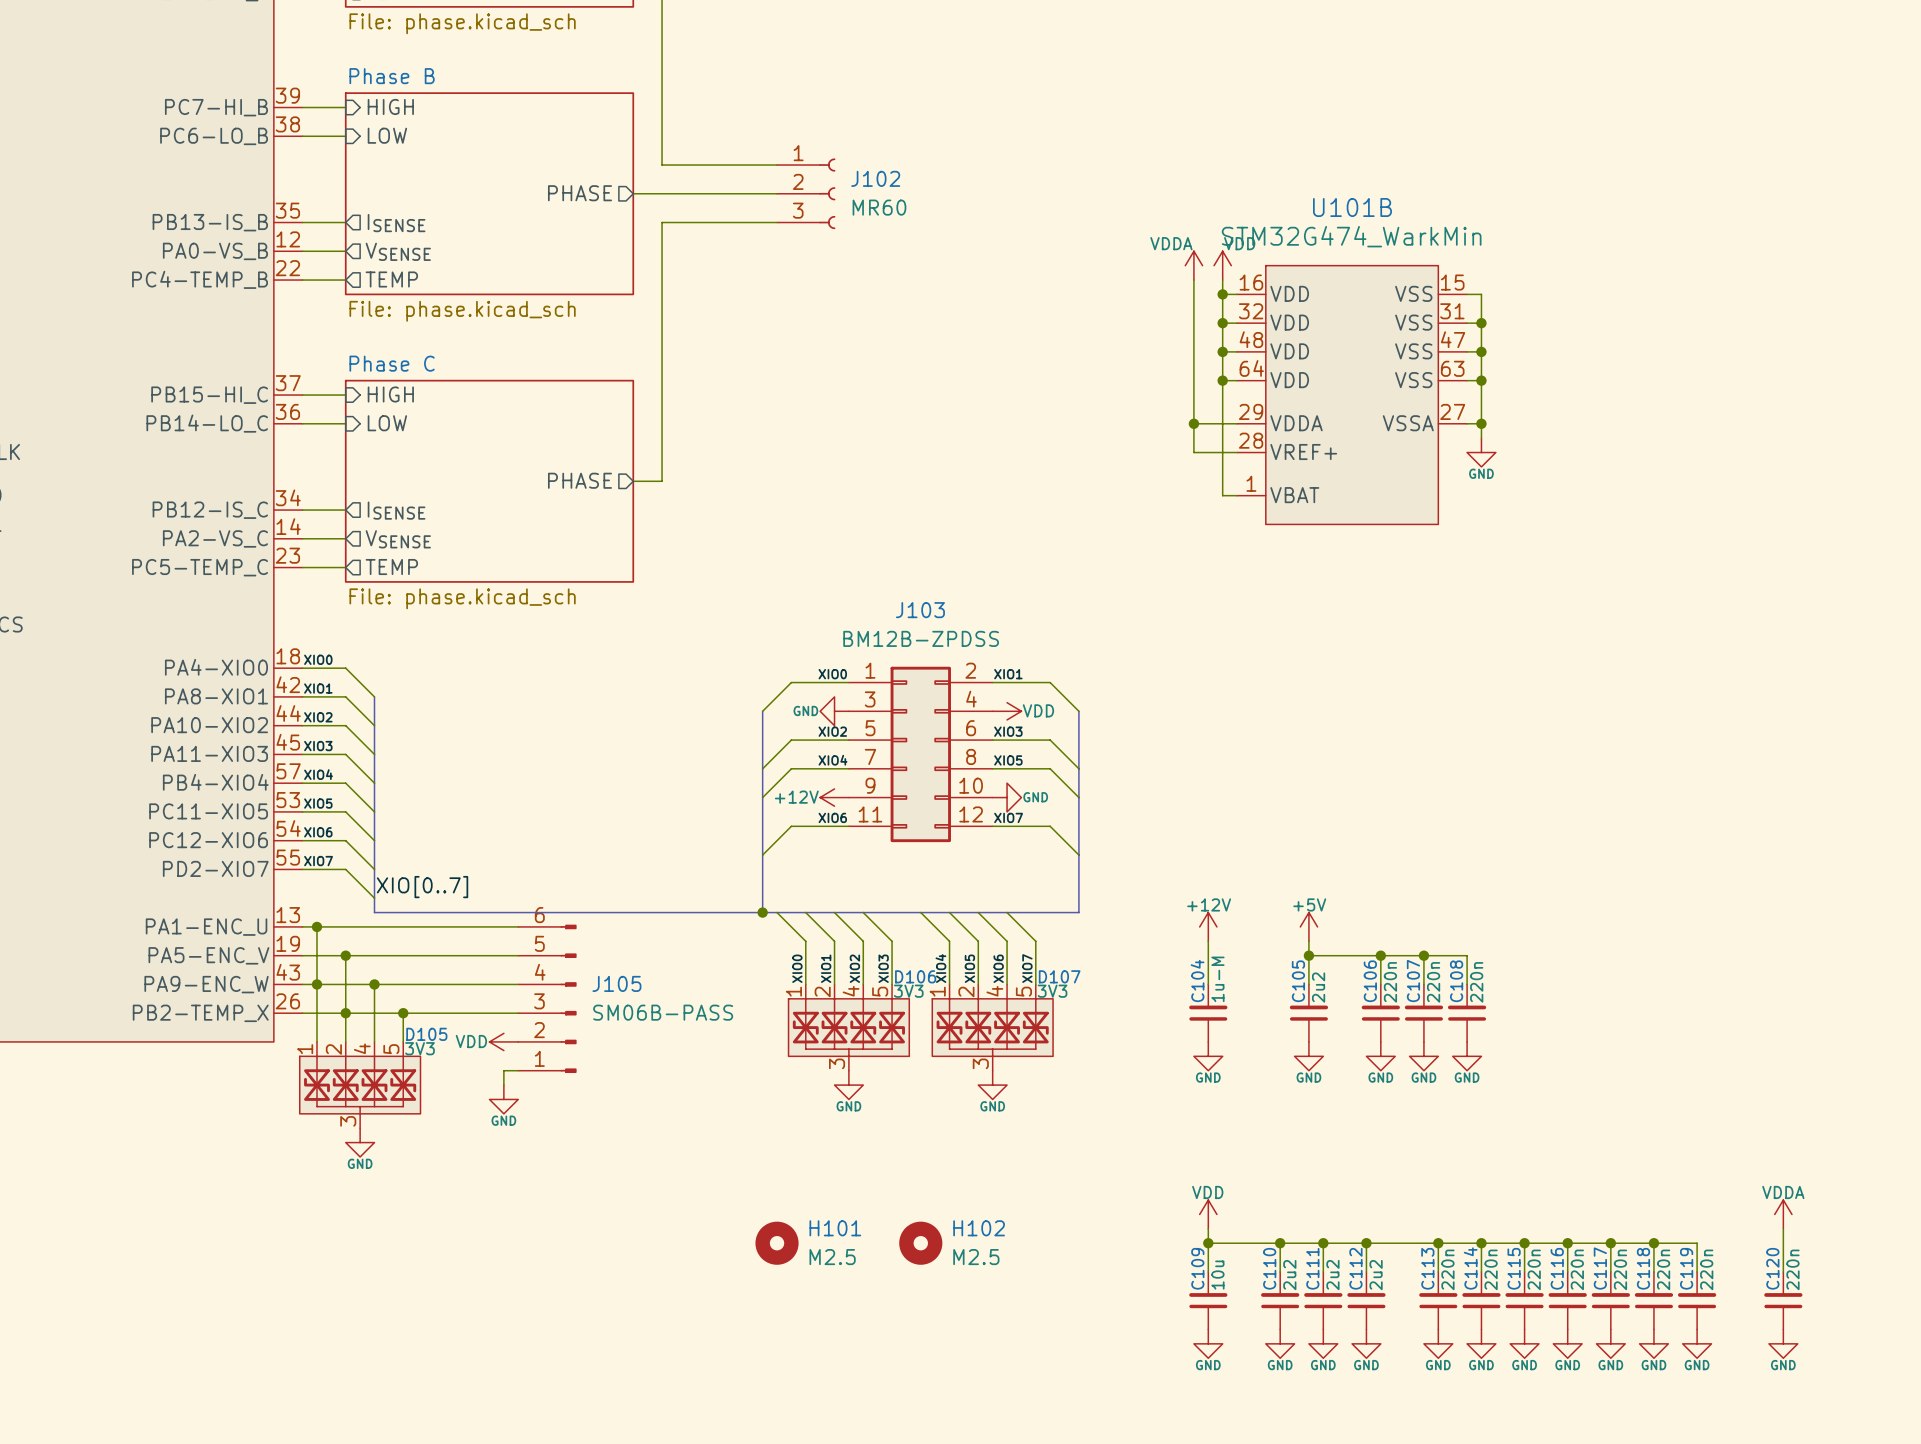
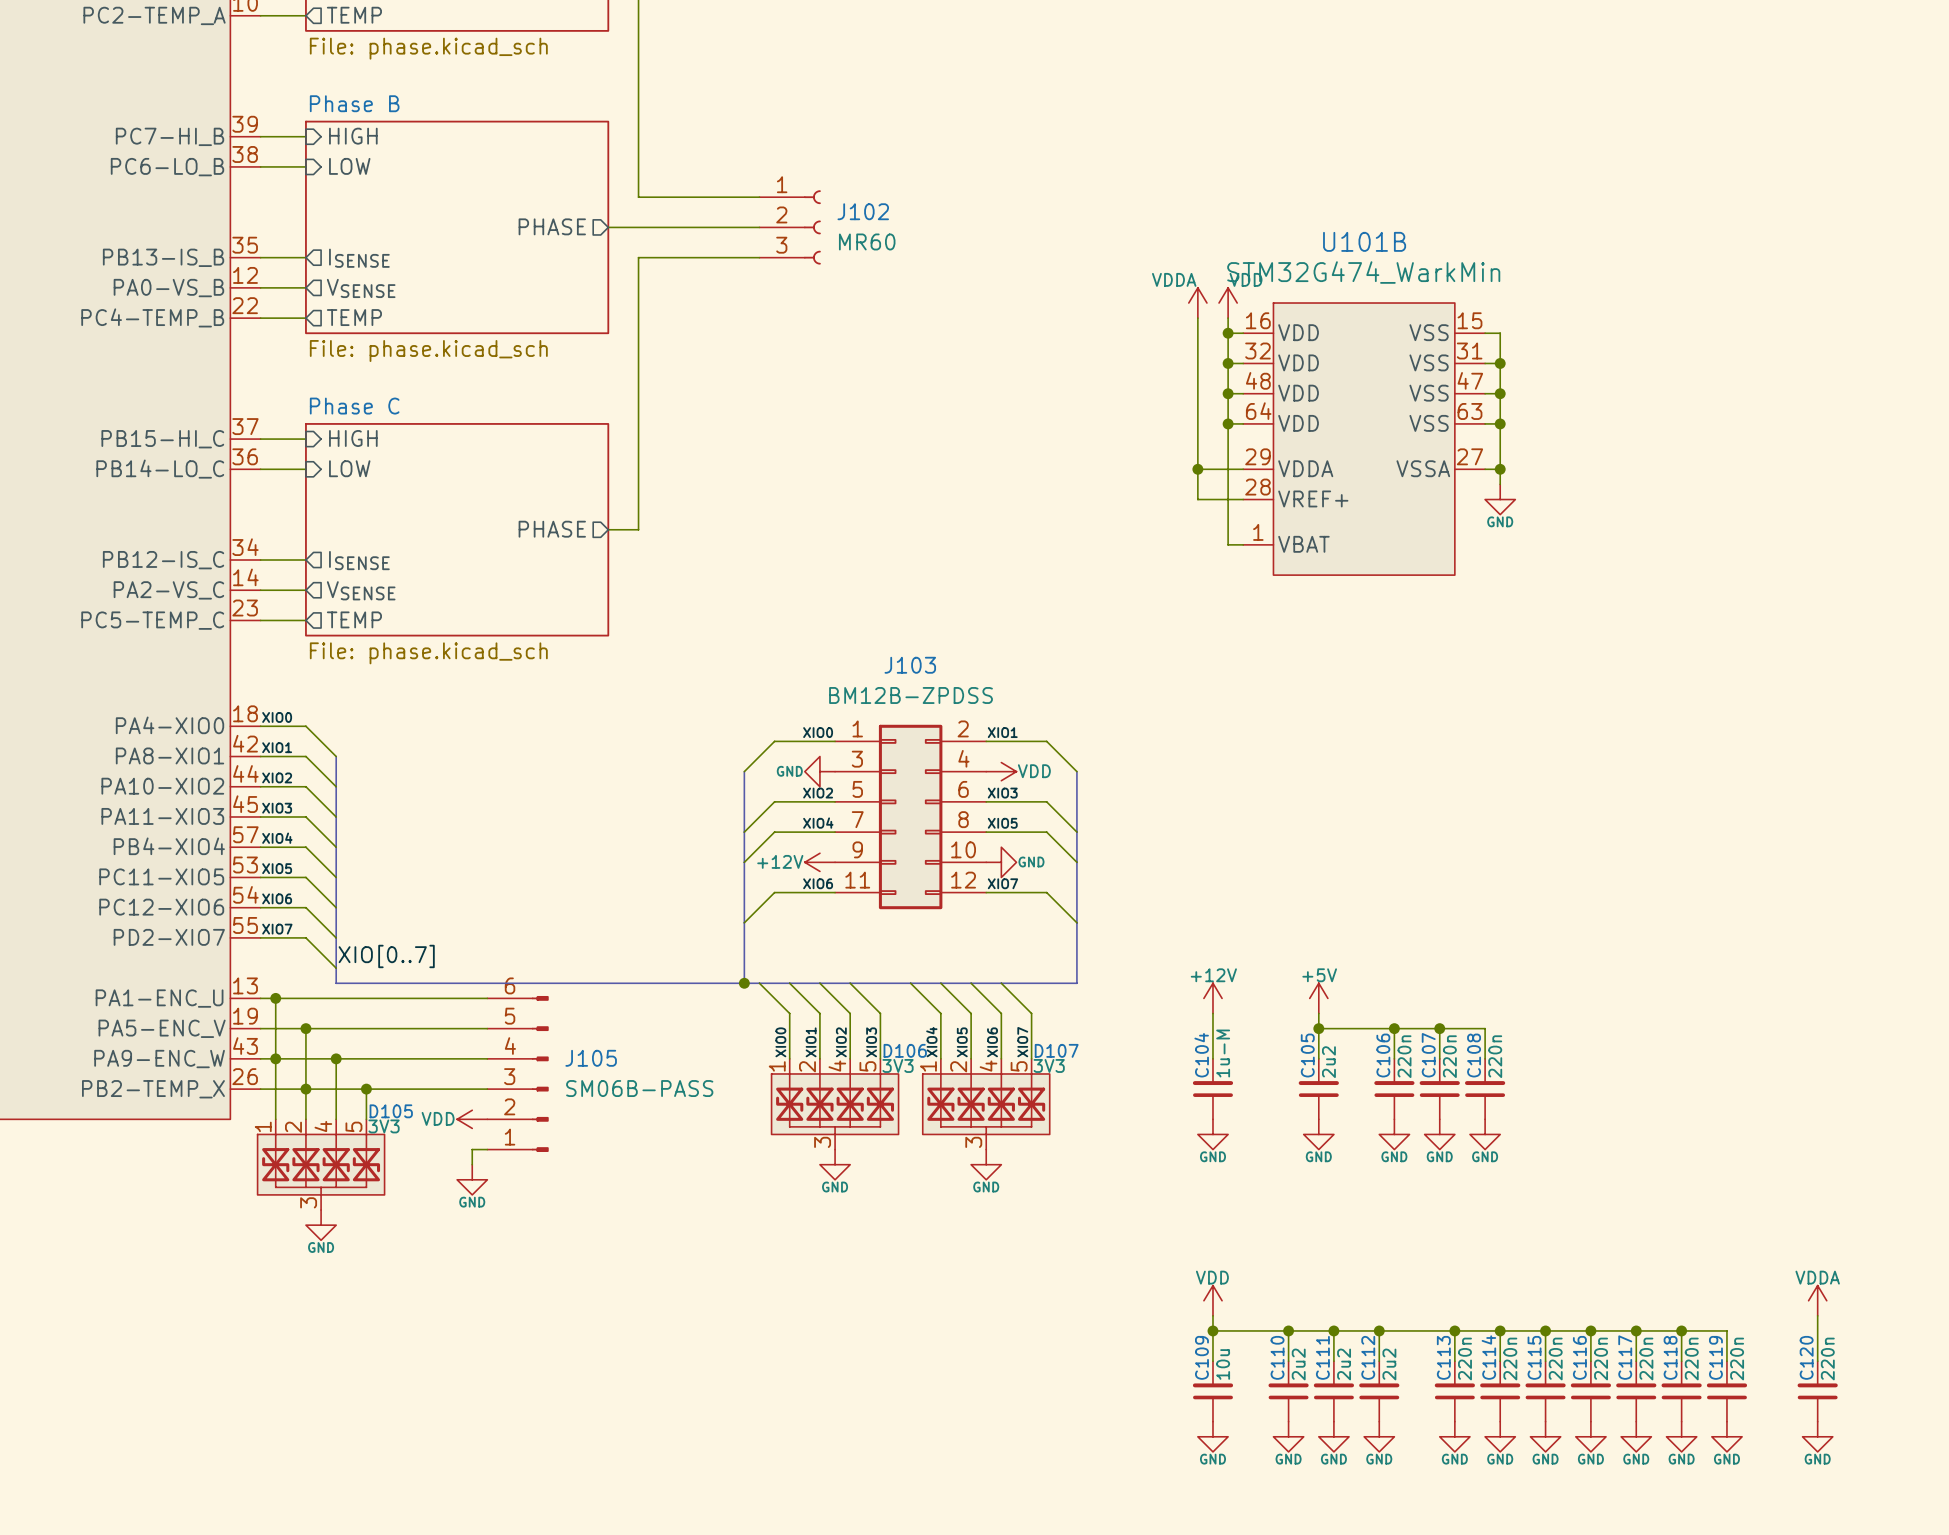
H101: M2.5 (777, 1243) -> none
H102: M2.5 (920, 1243) -> none

